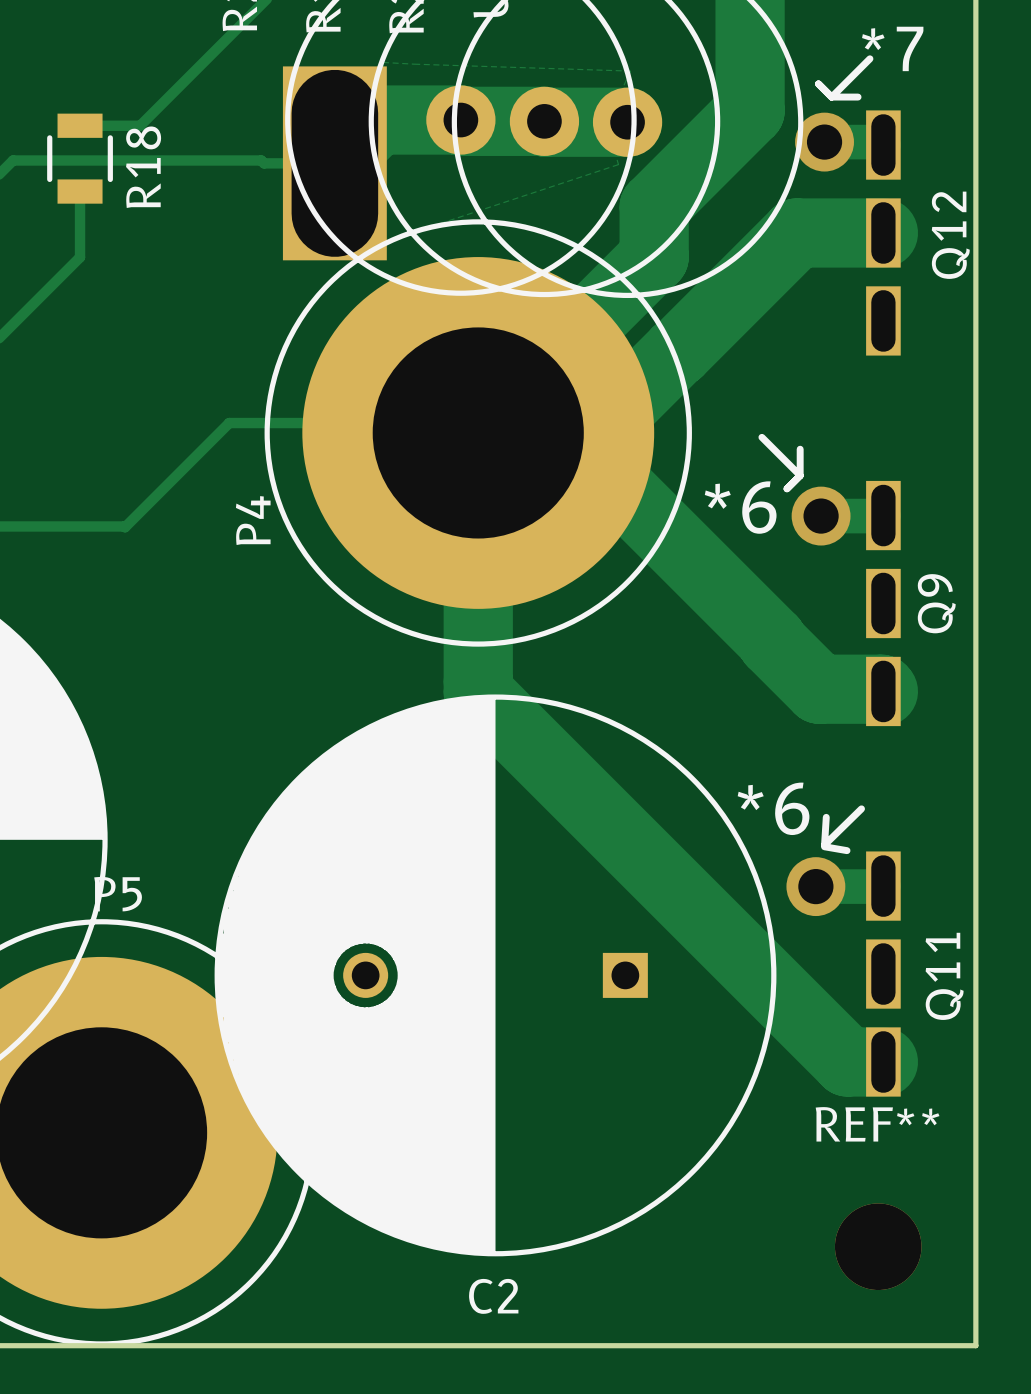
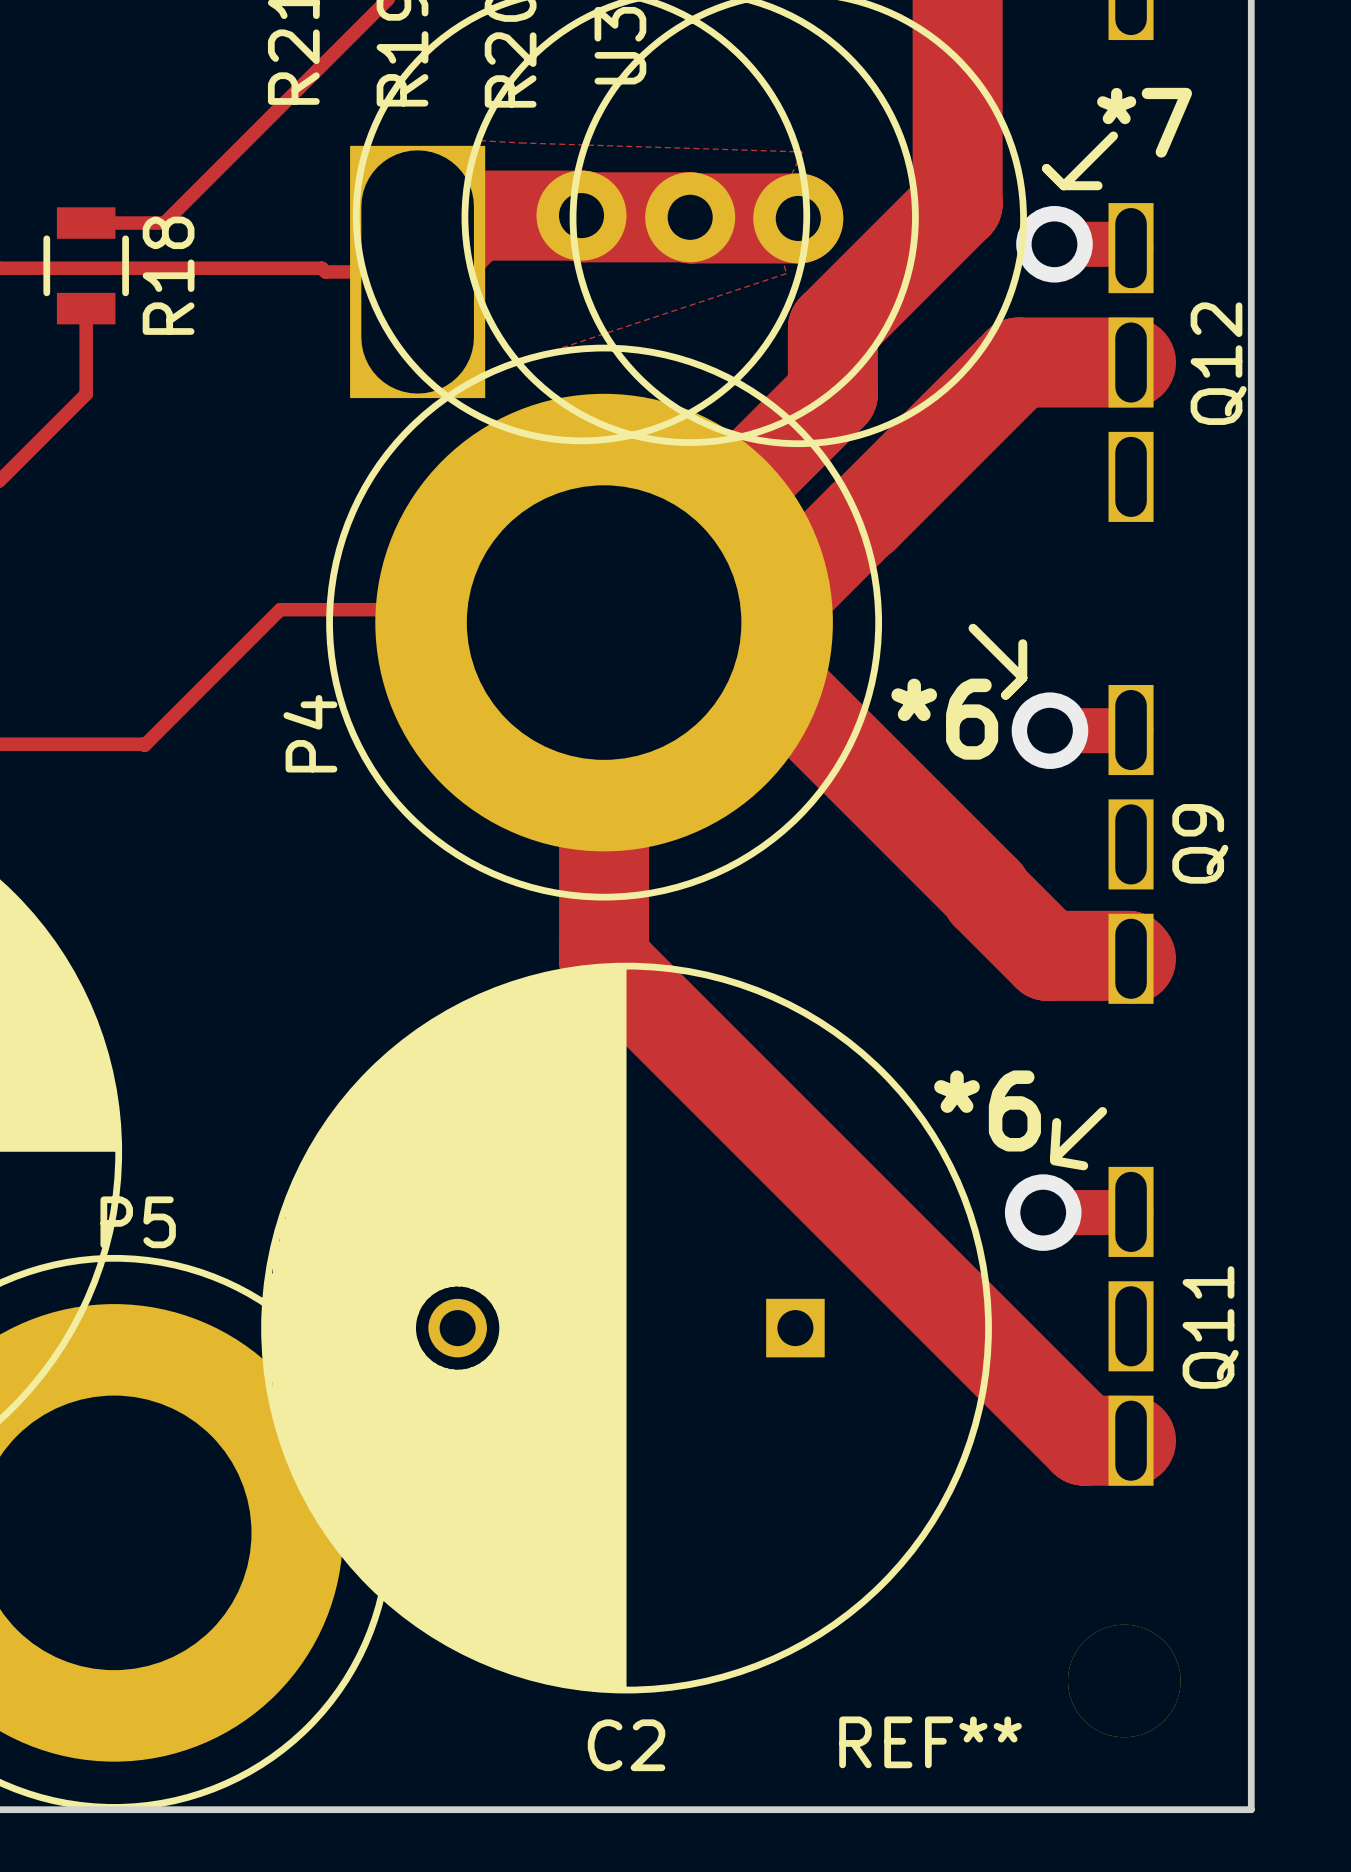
REF** name position: REF** (877, 1124) -> REF** (930, 1742)

